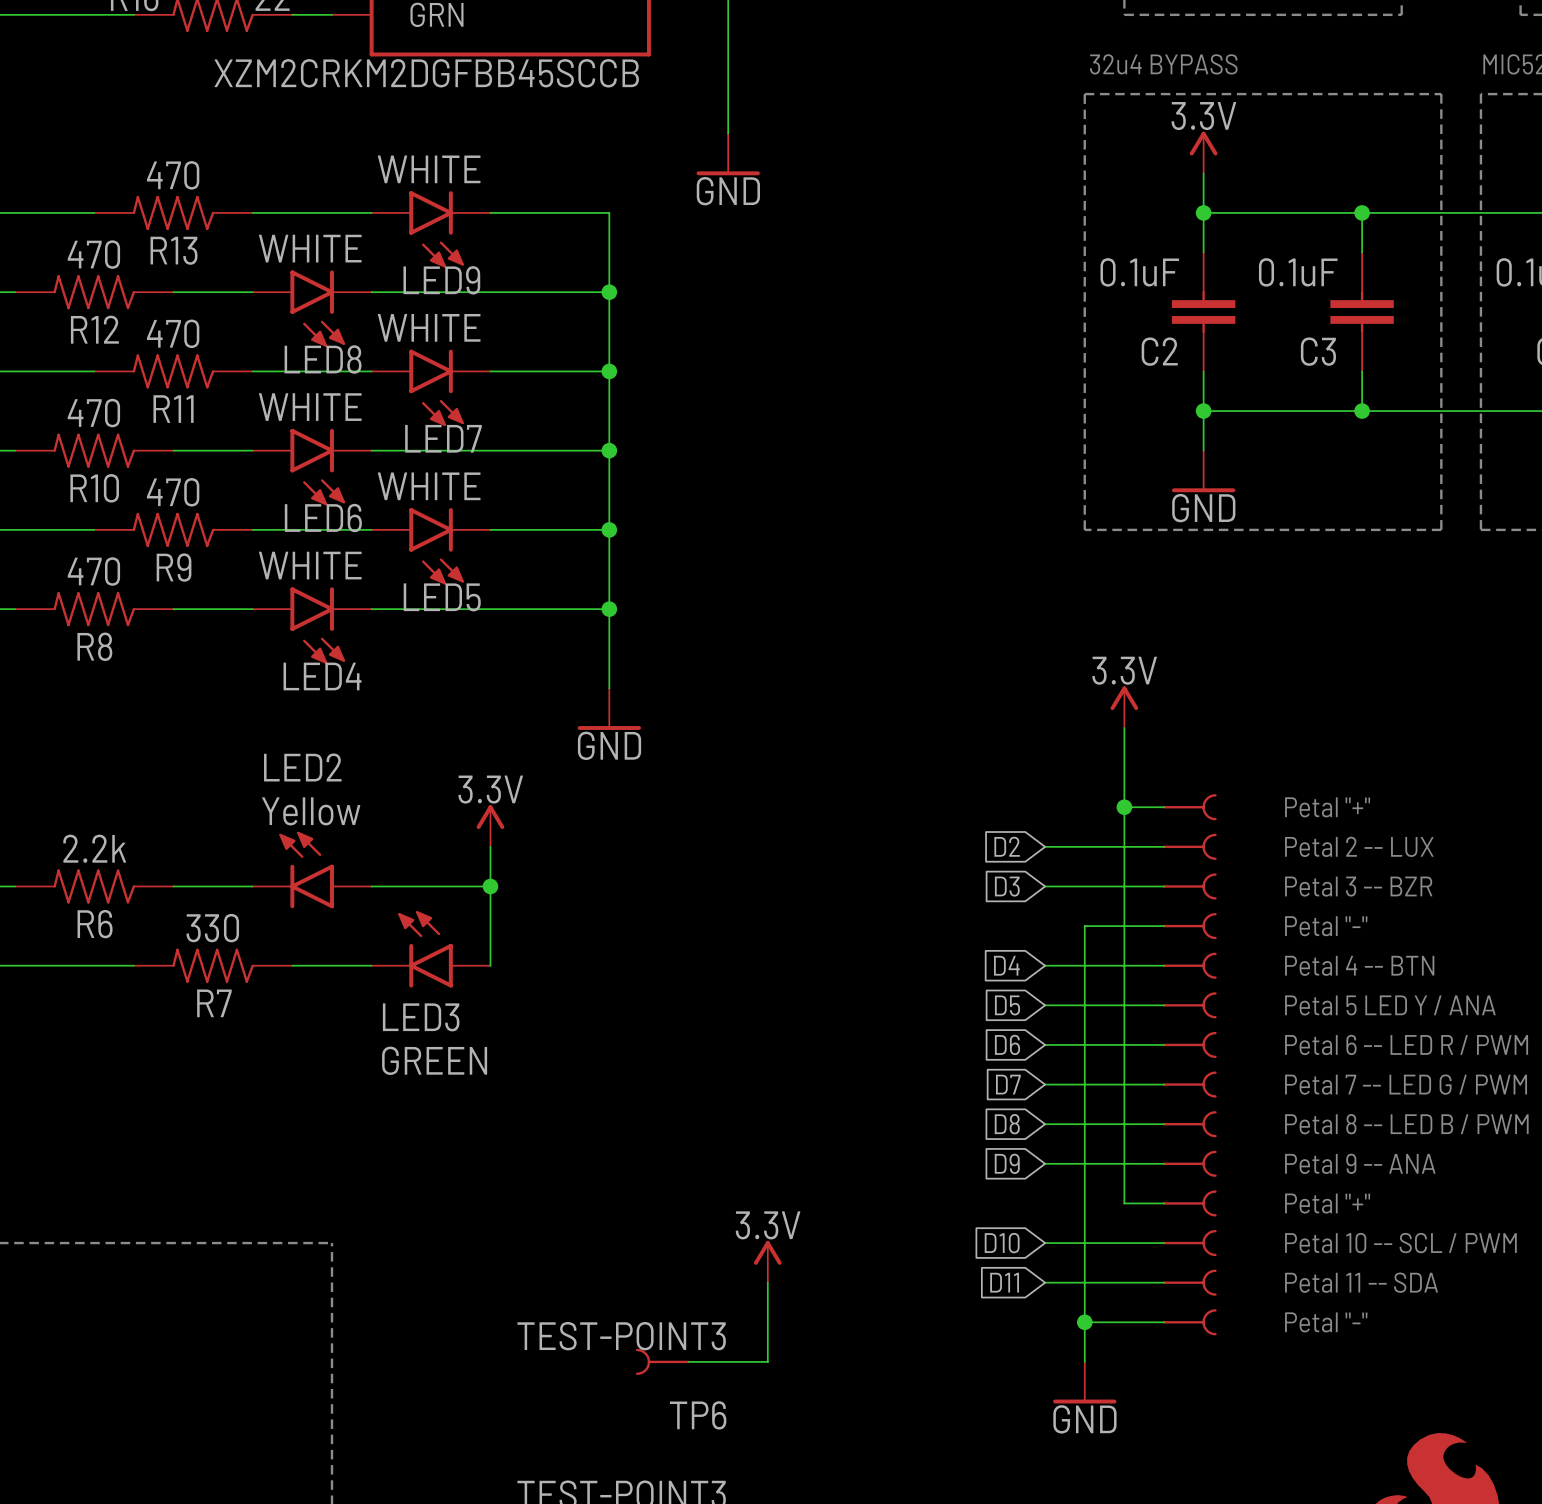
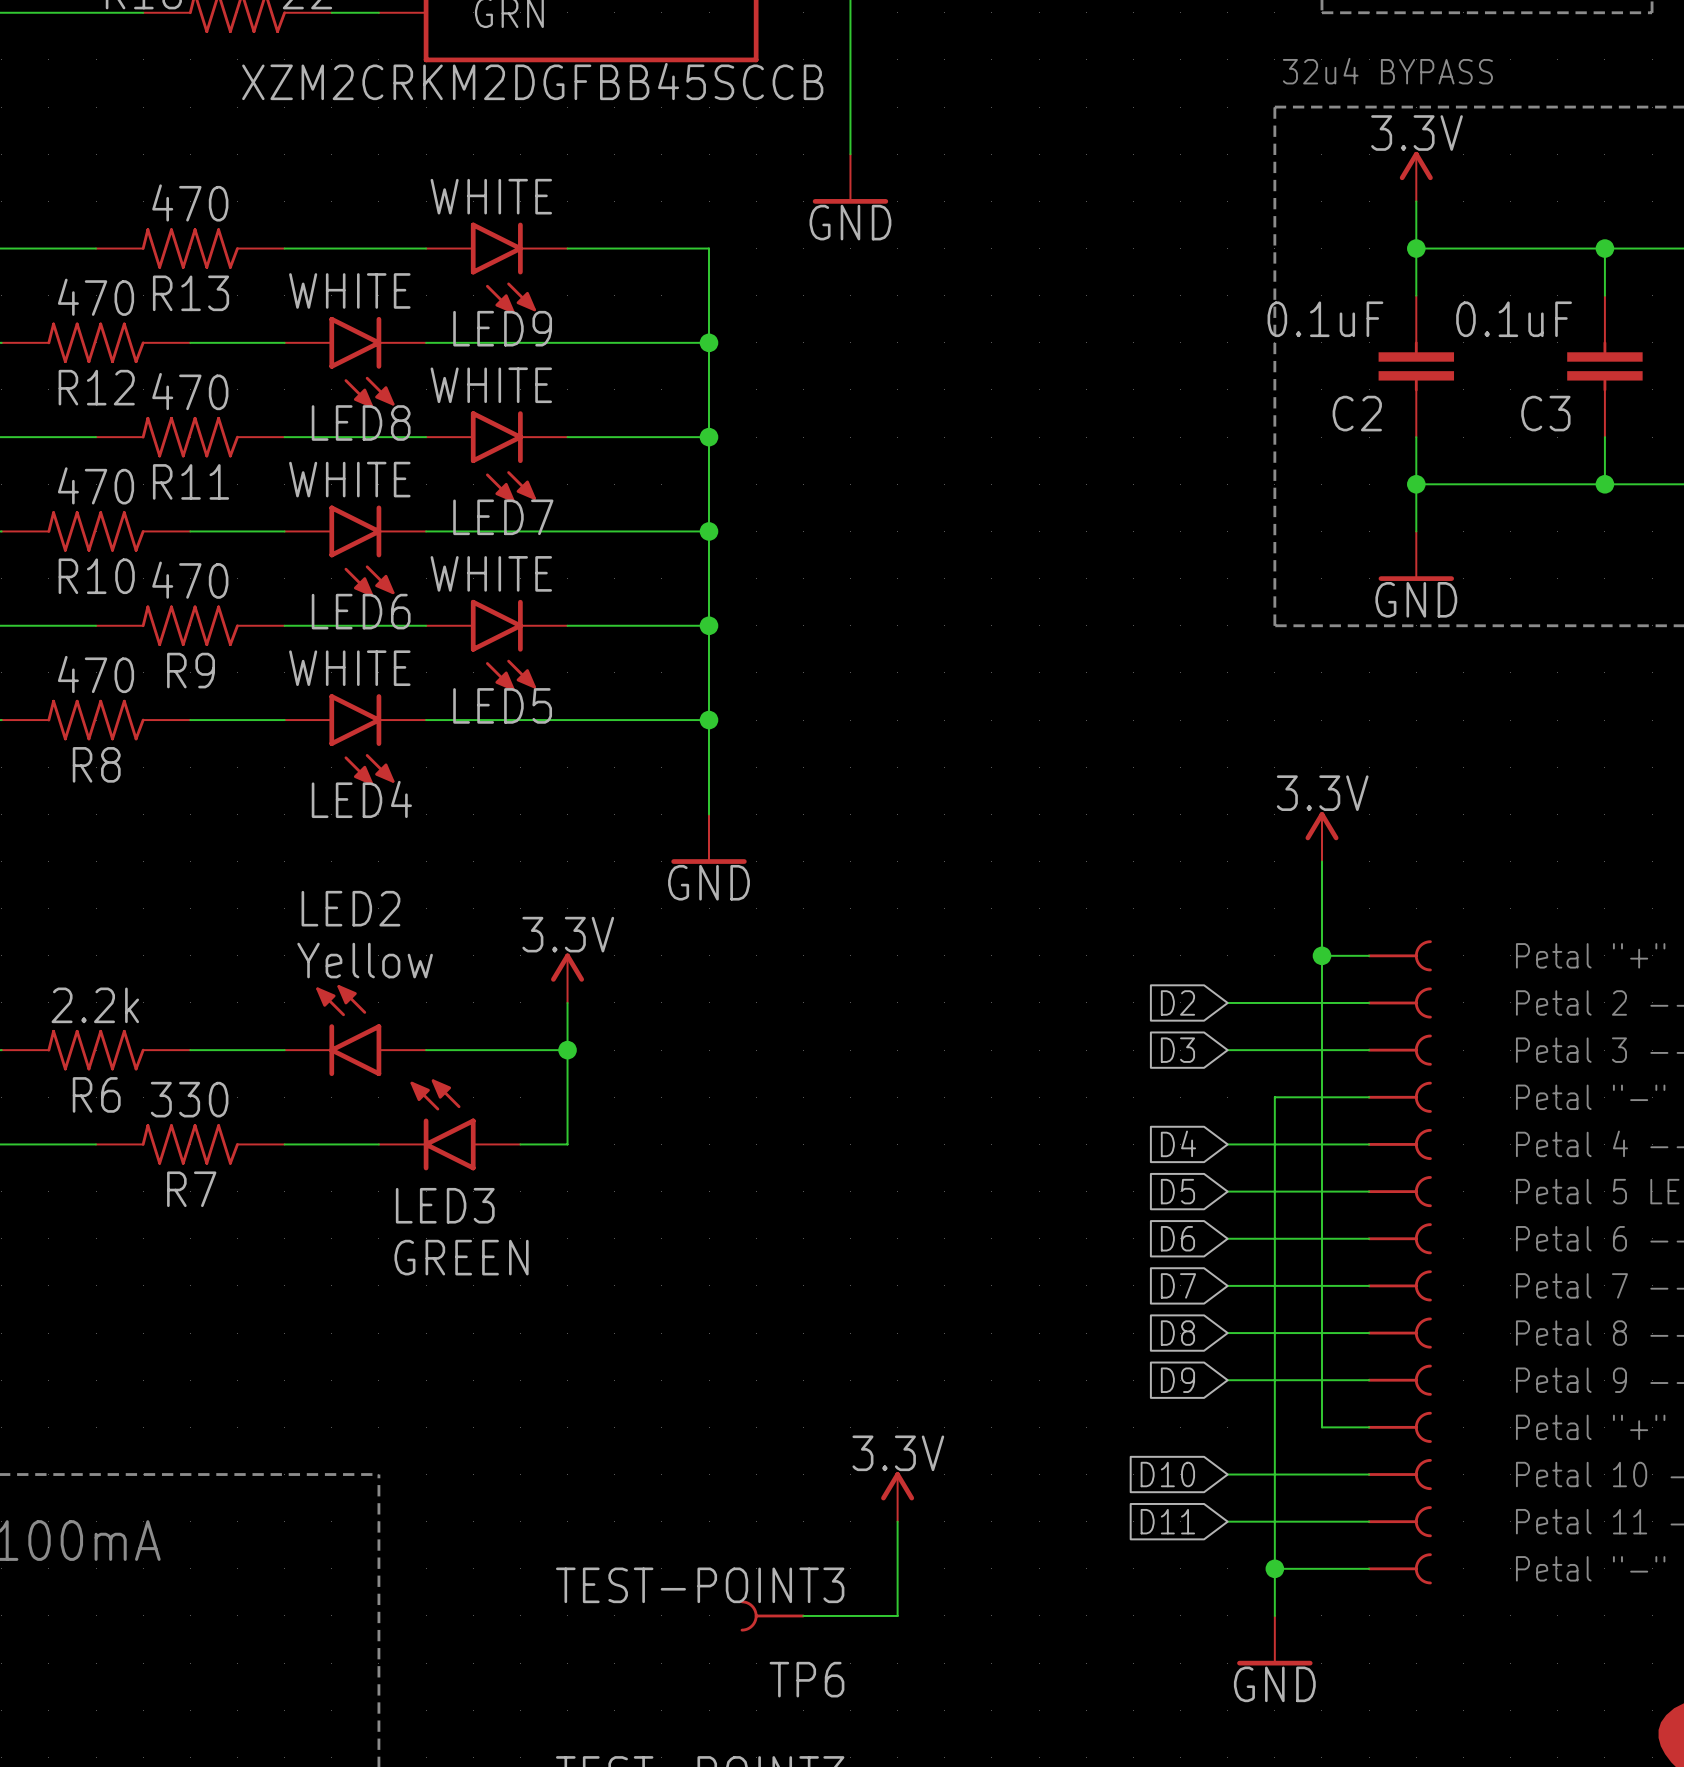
LED3 position: (431, 949) -> (449, 1124)
R7 position: (213, 965) -> (190, 1144)

